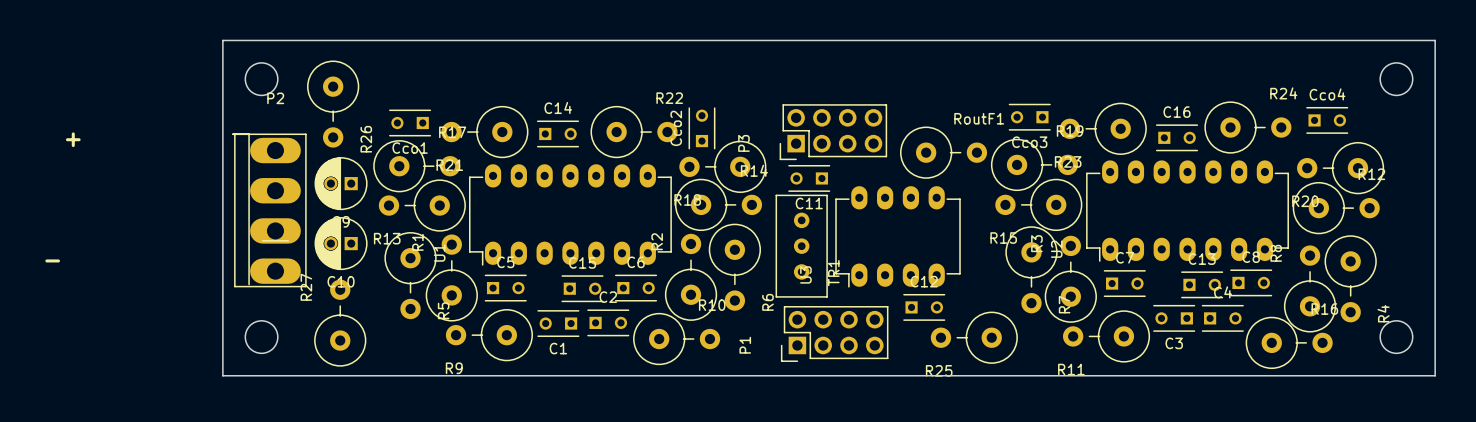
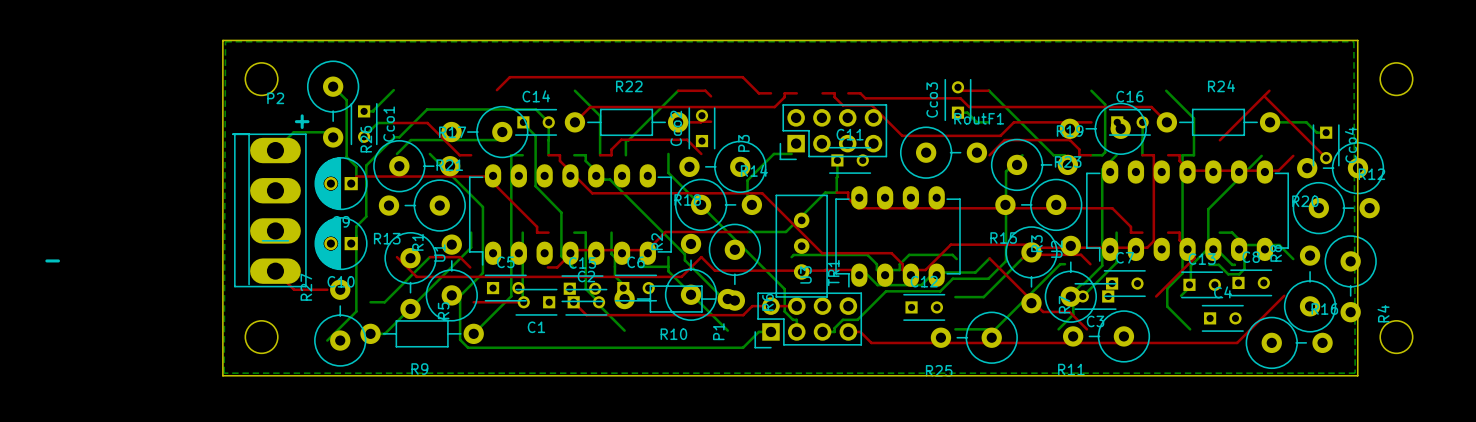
board edge: (1357, 40) (1435, 40) (1435, 375) (1357, 375) -> (1357, 40) (1357, 375)
bottom zone outline: none -> (225, 41) (1353, 41) (1355, 373) (224, 373) (225, 41)
bottom track: none -> (327, 81) (346, 100) (346, 156) (356, 166) (356, 176)
top track: none -> (957, 87) (961, 90) (988, 90)
bottom track: none -> (393, 90) (373, 111) (364, 111)
top track: none -> (496, 90) (509, 77) (742, 77) (758, 93) (770, 93)
bottom track: none -> (574, 90) (600, 115) (600, 155)
top track: none -> (678, 90) (705, 90) (711, 96)
bottom track: none -> (678, 90) (628, 140) (625, 140) (625, 155)
bottom track: none -> (988, 90) (1053, 155) (1065, 155)
bottom track: none -> (1091, 90) (1105, 104) (1105, 152) (1102, 155) (1090, 155)
bottom track: none -> (1166, 90) (1193, 118) (1193, 155) (1182, 155) (1182, 273) (1167, 288) (1167, 306) (1190, 329)
top track: none -> (1269, 90) (1219, 140)
top track: none -> (796, 93) (784, 93) (784, 97) (774, 107) (590, 107) (574, 122)
top track: none -> (822, 93) (834, 93) (834, 97) (842, 105) (871, 105) (902, 135) (1000, 135) (1013, 122) (1091, 122)
top track: none -> (848, 93) (860, 93) (865, 98) (960, 98) (969, 107) (1151, 107) (1166, 122)
R24 name position: R24 (1283, 93) -> R24 (1221, 86)
top track: none -> (1264, 96) (1326, 158)
R22 name position: R22 (669, 98) -> R22 (629, 86)
R24 footprint: [1204, 101, 1292, 154] -> [1156, 108, 1281, 137]
R22 footprint: [590, 105, 678, 159] -> [564, 108, 689, 137]
bottom track: none -> (957, 112) (967, 112) (977, 122) (988, 122)
Cco3 rotation: 0° (1029, 117) -> 90° clockwise (957, 99)
Cco3 position: (1029, 117) -> (957, 99)
Cco4 rotation: 0° (1327, 120) -> 90° clockwise (1326, 145)
top track: none -> (711, 121) (678, 122)
bottom track: none -> (523, 122) (535, 135) (535, 186) (561, 212) (561, 256) (573, 267)
bottom track: none -> (1142, 122) (1142, 155)
bottom track: none -> (1270, 122) (1306, 122) (1316, 132) (1326, 132)
top track: none -> (393, 123) (427, 123) (459, 155) (471, 155)
bottom track: none -> (393, 123) (377, 123) (364, 136)
Cco1 rotation: 0° (410, 123) -> 90° counterclockwise (364, 124)
Cco1 position: (410, 123) -> (364, 124)
bottom track: none -> (327, 132) (293, 132) (275, 150)
C14 position: (557, 133) -> (536, 122)
C16 position: (1177, 137) -> (1129, 122)
text position: + (73, 139) -> + (302, 121)
bottom track: none -> (496, 140) (410, 140) (396, 153)
bottom track: none -> (429, 153) (482, 207) (482, 273) (460, 295) (460, 339) (468, 347) (743, 347) (758, 331) (770, 331)
bottom track: none -> (668, 153) (668, 172) (784, 289) (784, 311) (793, 319) (796, 319) (796, 331)
top track: none -> (701, 153) (687, 139) (621, 139) (611, 149) (611, 155) (600, 155)
bottom track: none -> (791, 153) (773, 153) (747, 180) (747, 206)
bottom track: none -> (522, 155) (511, 155) (511, 296) (473, 333)
top track: none -> (548, 155) (559, 155) (559, 160) (592, 193) (762, 193) (822, 253) (891, 253) (902, 264) (902, 270) (925, 270) (950, 244) (1032, 244) (1036, 247) (1147, 247) (1153, 241) (1153, 155) (1142, 155)
bottom track: none -> (548, 155) (548, 122) (535, 109) (427, 109) (399, 137) (394, 137) (366, 165) (366, 216) (356, 226) (356, 311) (327, 340)
bottom track: none -> (574, 155) (585, 155) (585, 161) (604, 179) (609, 179) (684, 254) (684, 260) (723, 299) (727, 299)
top track: none -> (989, 155) (1004, 140) (1069, 140) (1079, 149) (1079, 155) (1090, 155)
bottom track: none -> (1022, 155) (1006, 171) (1006, 261) (988, 278) (952, 278) (940, 291) (886, 291) (857, 319) (842, 319) (834, 328) (834, 331) (822, 331)
bottom track: none -> (1116, 155) (1102, 169) (1102, 265) (1073, 292) (1073, 314) (1058, 329)
top track: none -> (1168, 155) (1179, 155) (1179, 160) (1189, 170) (1278, 170) (1293, 155)
bottom track: none -> (1261, 155) (1208, 209) (1208, 240) (1212, 244)
bottom track: none -> (837, 160) (836, 192) (825, 192) (785, 231) (747, 231)
top track: none -> (356, 176) (486, 176) (537, 226) (537, 232) (548, 232)
C11 rotation: 0° (809, 178) -> 180° (850, 160)
C11 position: (809, 178) -> (850, 160)
top track: none -> (836, 192) (848, 192) (848, 198) (858, 208) (1112, 208) (1130, 226) (1130, 232) (1142, 232)
top track: none -> (747, 231) (665, 231) (647, 250) (574, 250) (557, 267) (547, 267)
bottom track: none -> (471, 232) (471, 247) (384, 333) (370, 333)
bottom track: none -> (522, 232) (523, 302)
bottom track: none -> (574, 232) (585, 232) (585, 288) (624, 330)
bottom track: none -> (611, 232) (611, 254) (614, 257) (614, 276) (624, 285) (624, 299)
bottom track: none -> (1116, 232) (1116, 262) (1082, 296)
top track: none -> (1168, 232) (1179, 232) (1179, 240) (1194, 255) (1194, 258) (1156, 296)
bottom track: none -> (1219, 232) (1232, 232) (1244, 245)
bottom track: none -> (1212, 244) (1190, 265) (1190, 286) (1181, 295)
bottom track: none -> (1212, 244) (1232, 264) (1234, 264)
bottom track: none -> (1244, 245) (1279, 245) (1293, 259)
bottom track: none -> (1244, 245) (1244, 268) (1239, 274) (1228, 274) (1218, 264) (1209, 264)
top track: none -> (396, 257) (416, 276) (681, 276) (701, 257) (714, 270) (862, 270)
top track: none -> (429, 257) (459, 257) (470, 267)
bottom track: none -> (429, 257) (384, 302) (370, 302)
bottom track: none -> (668, 257) (668, 271) (727, 330)
bottom track: none -> (791, 257) (793, 254) (867, 254) (876, 264) (876, 270) (899, 270) (899, 264) (909, 254) (952, 254) (956, 259)
top track: none -> (989, 258) (1043, 311) (1069, 311) (1086, 329)
bottom track: none -> (989, 258) (975, 272) (934, 272) (921, 285) (877, 285) (862, 270)
top track: none -> (1022, 258) (1026, 254) (1081, 254) (1090, 264)
bottom track: none -> (1022, 258) (983, 297) (955, 297)
bottom track: none -> (1065, 264) (1060, 264) (995, 329) (955, 329)
bottom track: none -> (640, 266) (668, 266)
top track: none -> (275, 271) (294, 289) (327, 289)
top track: none -> (1284, 295) (1237, 342) (871, 342) (860, 331) (848, 331)
top track: none -> (473, 302) (523, 302)
top track: none -> (573, 302) (586, 315) (743, 315) (752, 306) (796, 306)
R10 name position: R10 (712, 305) -> R10 (673, 334)
R9 footprint: [445, 309, 533, 362] -> [360, 320, 484, 348]
R10 footprint: [633, 312, 721, 366] -> [614, 285, 738, 313]
C3 position: (1174, 318) -> (1095, 296)
C2 position: (608, 322) -> (586, 302)
C1 position: (558, 323) -> (536, 302)
P1 position: (834, 333) -> (808, 320)
R9 name position: R9 (454, 368) -> R9 (419, 369)

